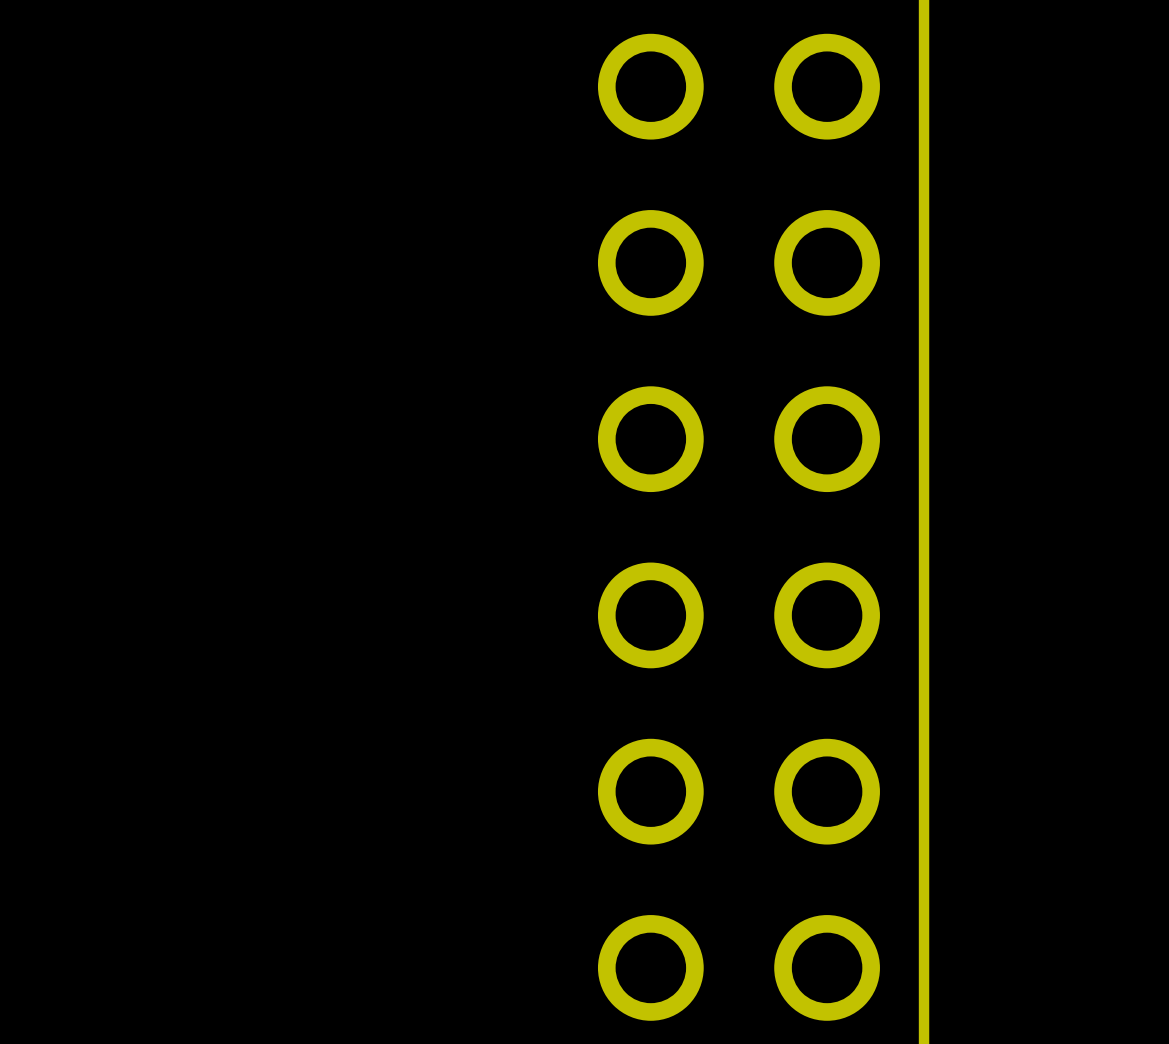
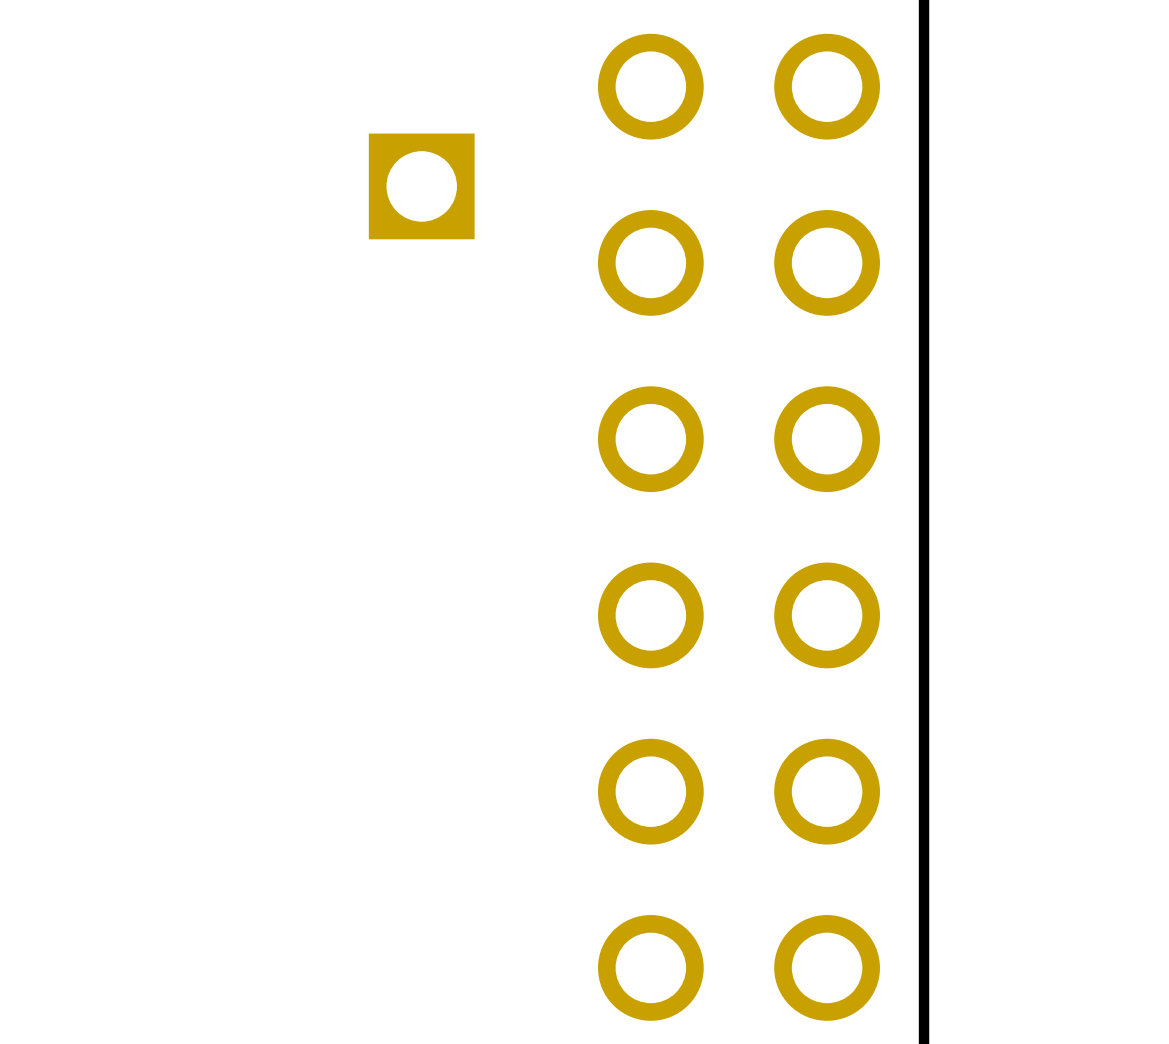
part: none -> (421, 186)

